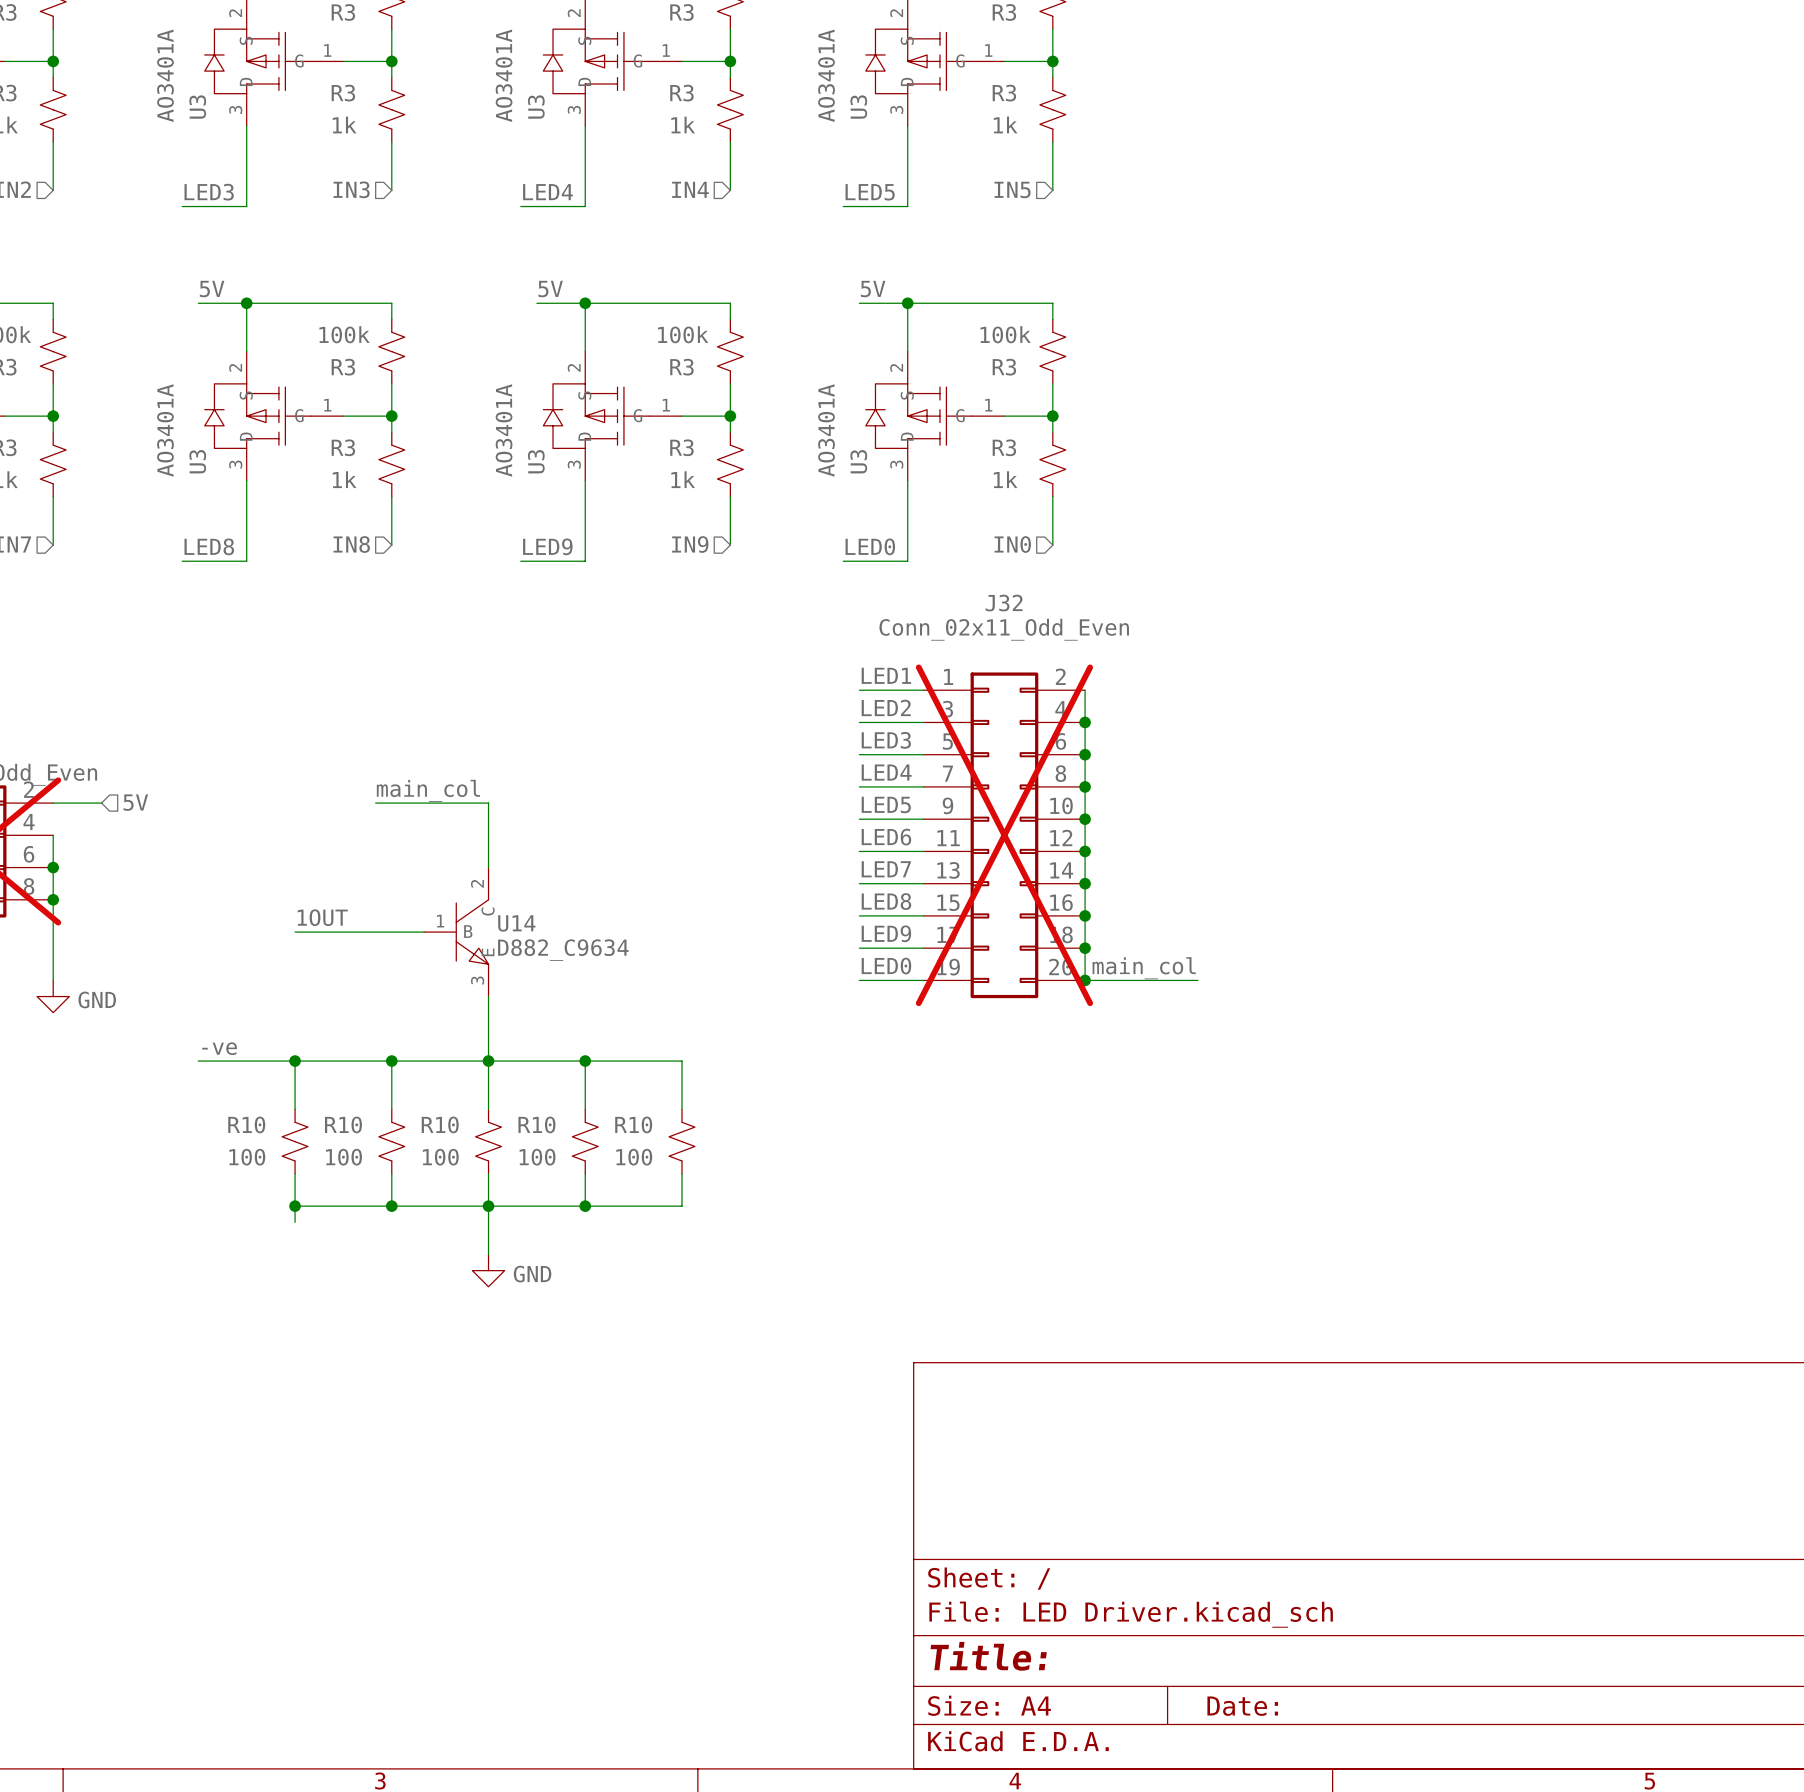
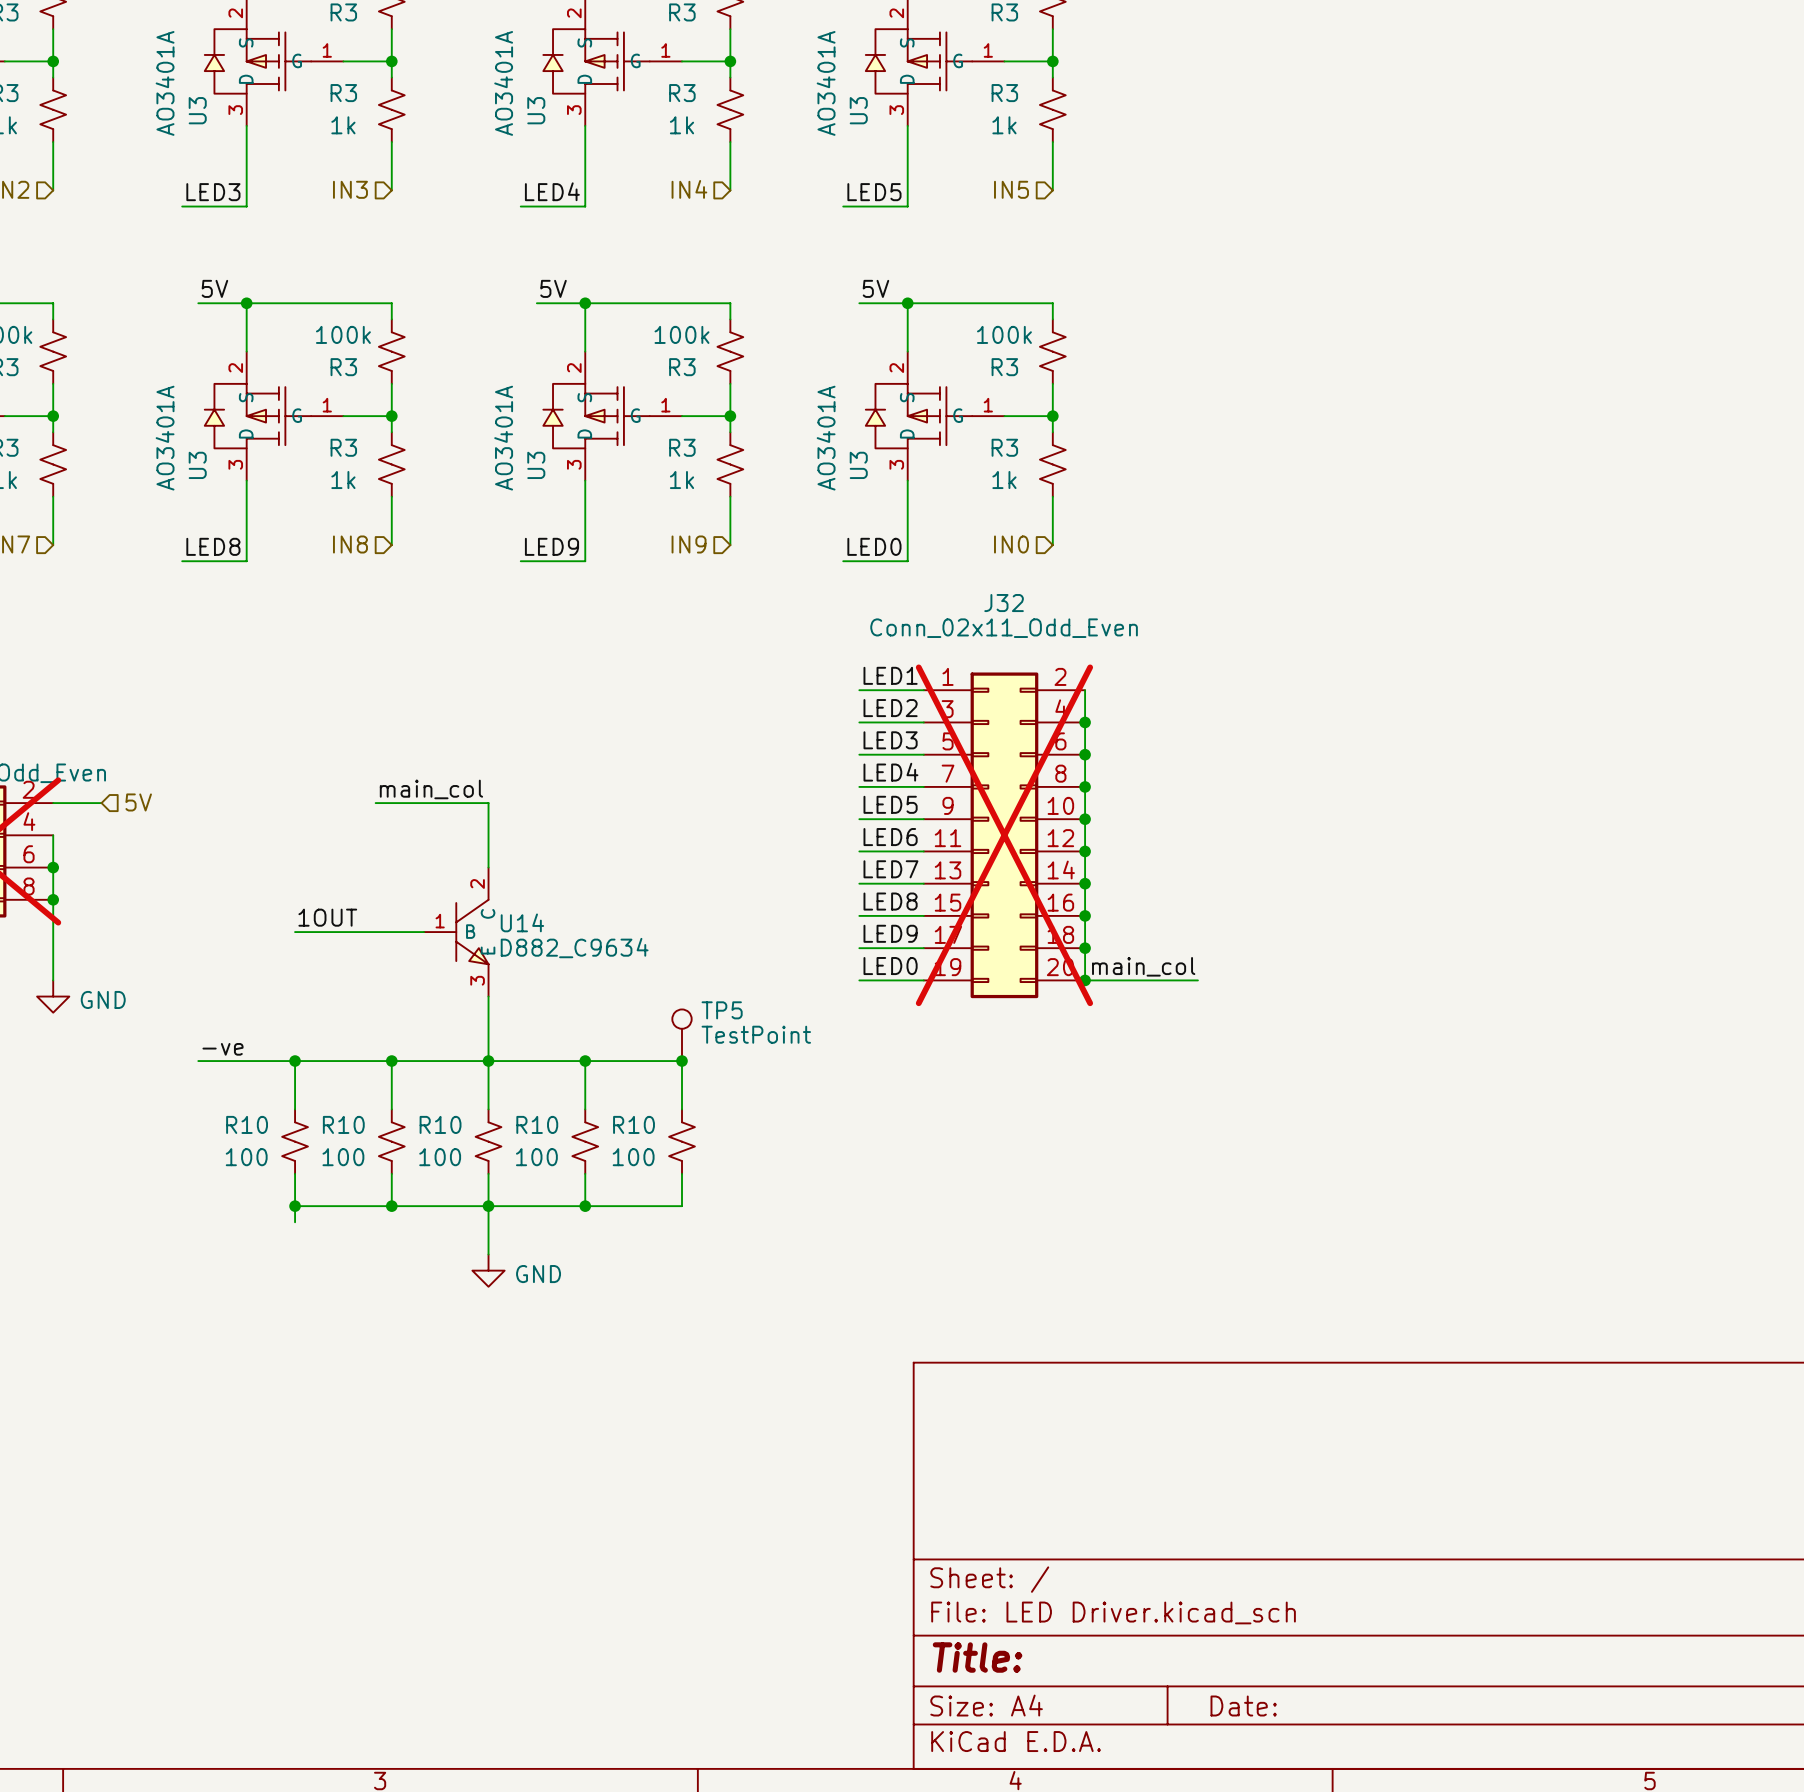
TP5: none -> TestPoint (682, 1035)
junction: none -> (682, 1061)

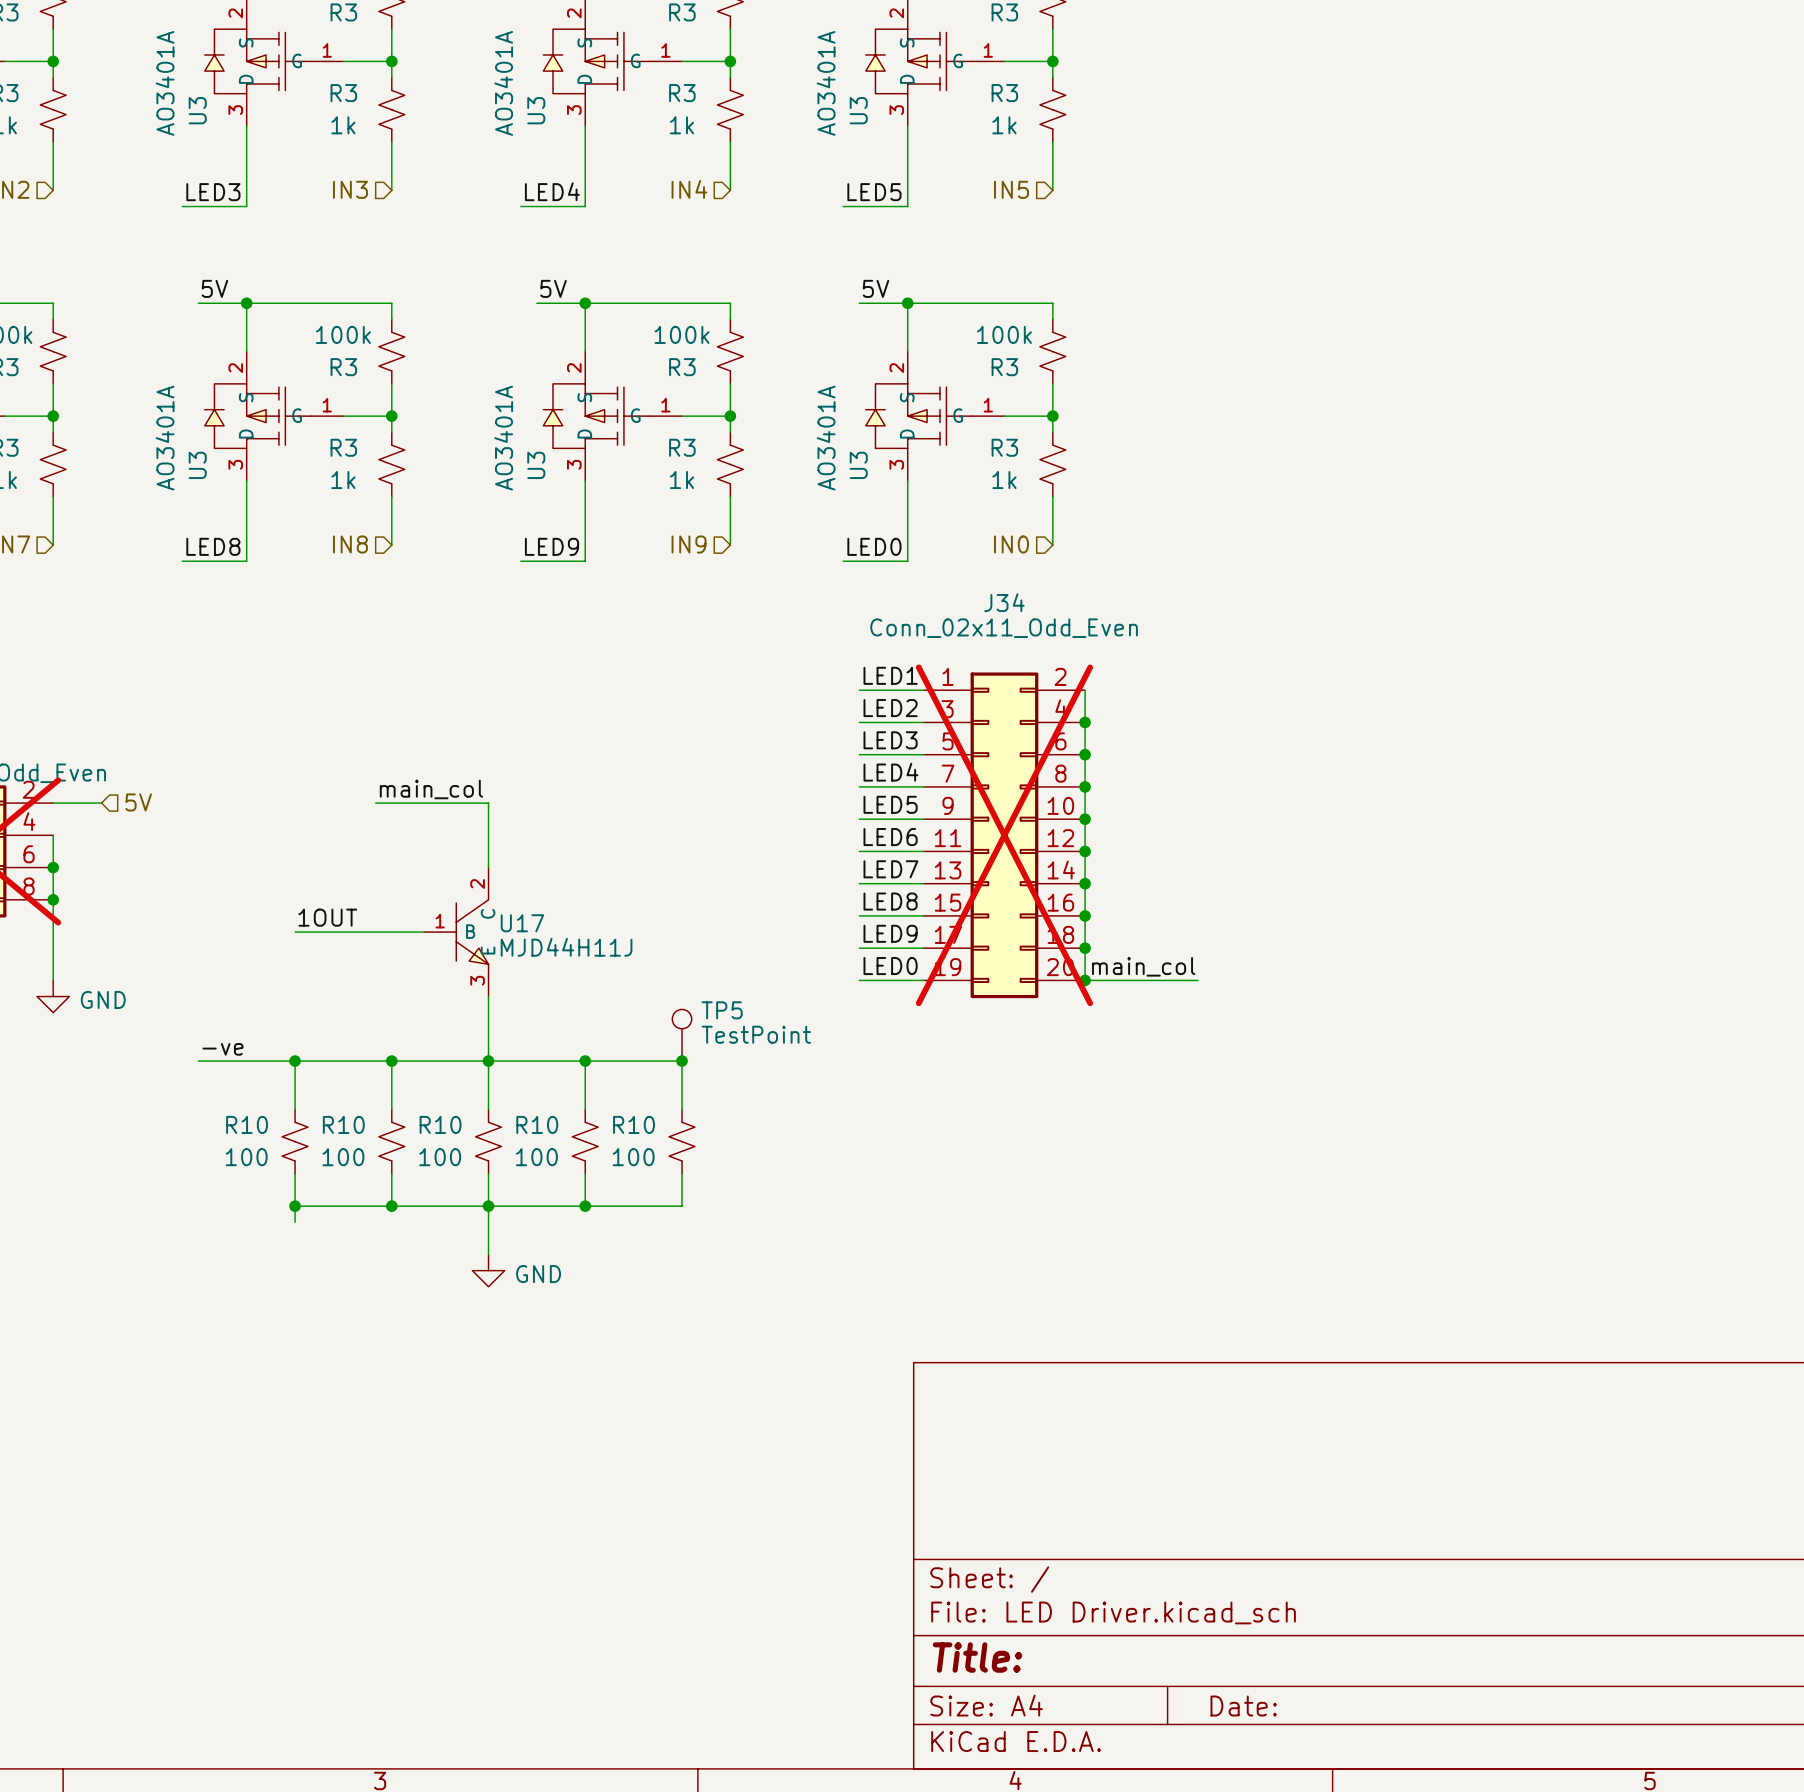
J32 name: J32 (1004, 603) -> J34 (1004, 602)
U14 name: U14 (522, 922) -> U17 (522, 923)
U14 value: D882_C9634 (574, 948) -> MJD44H11J (566, 947)

